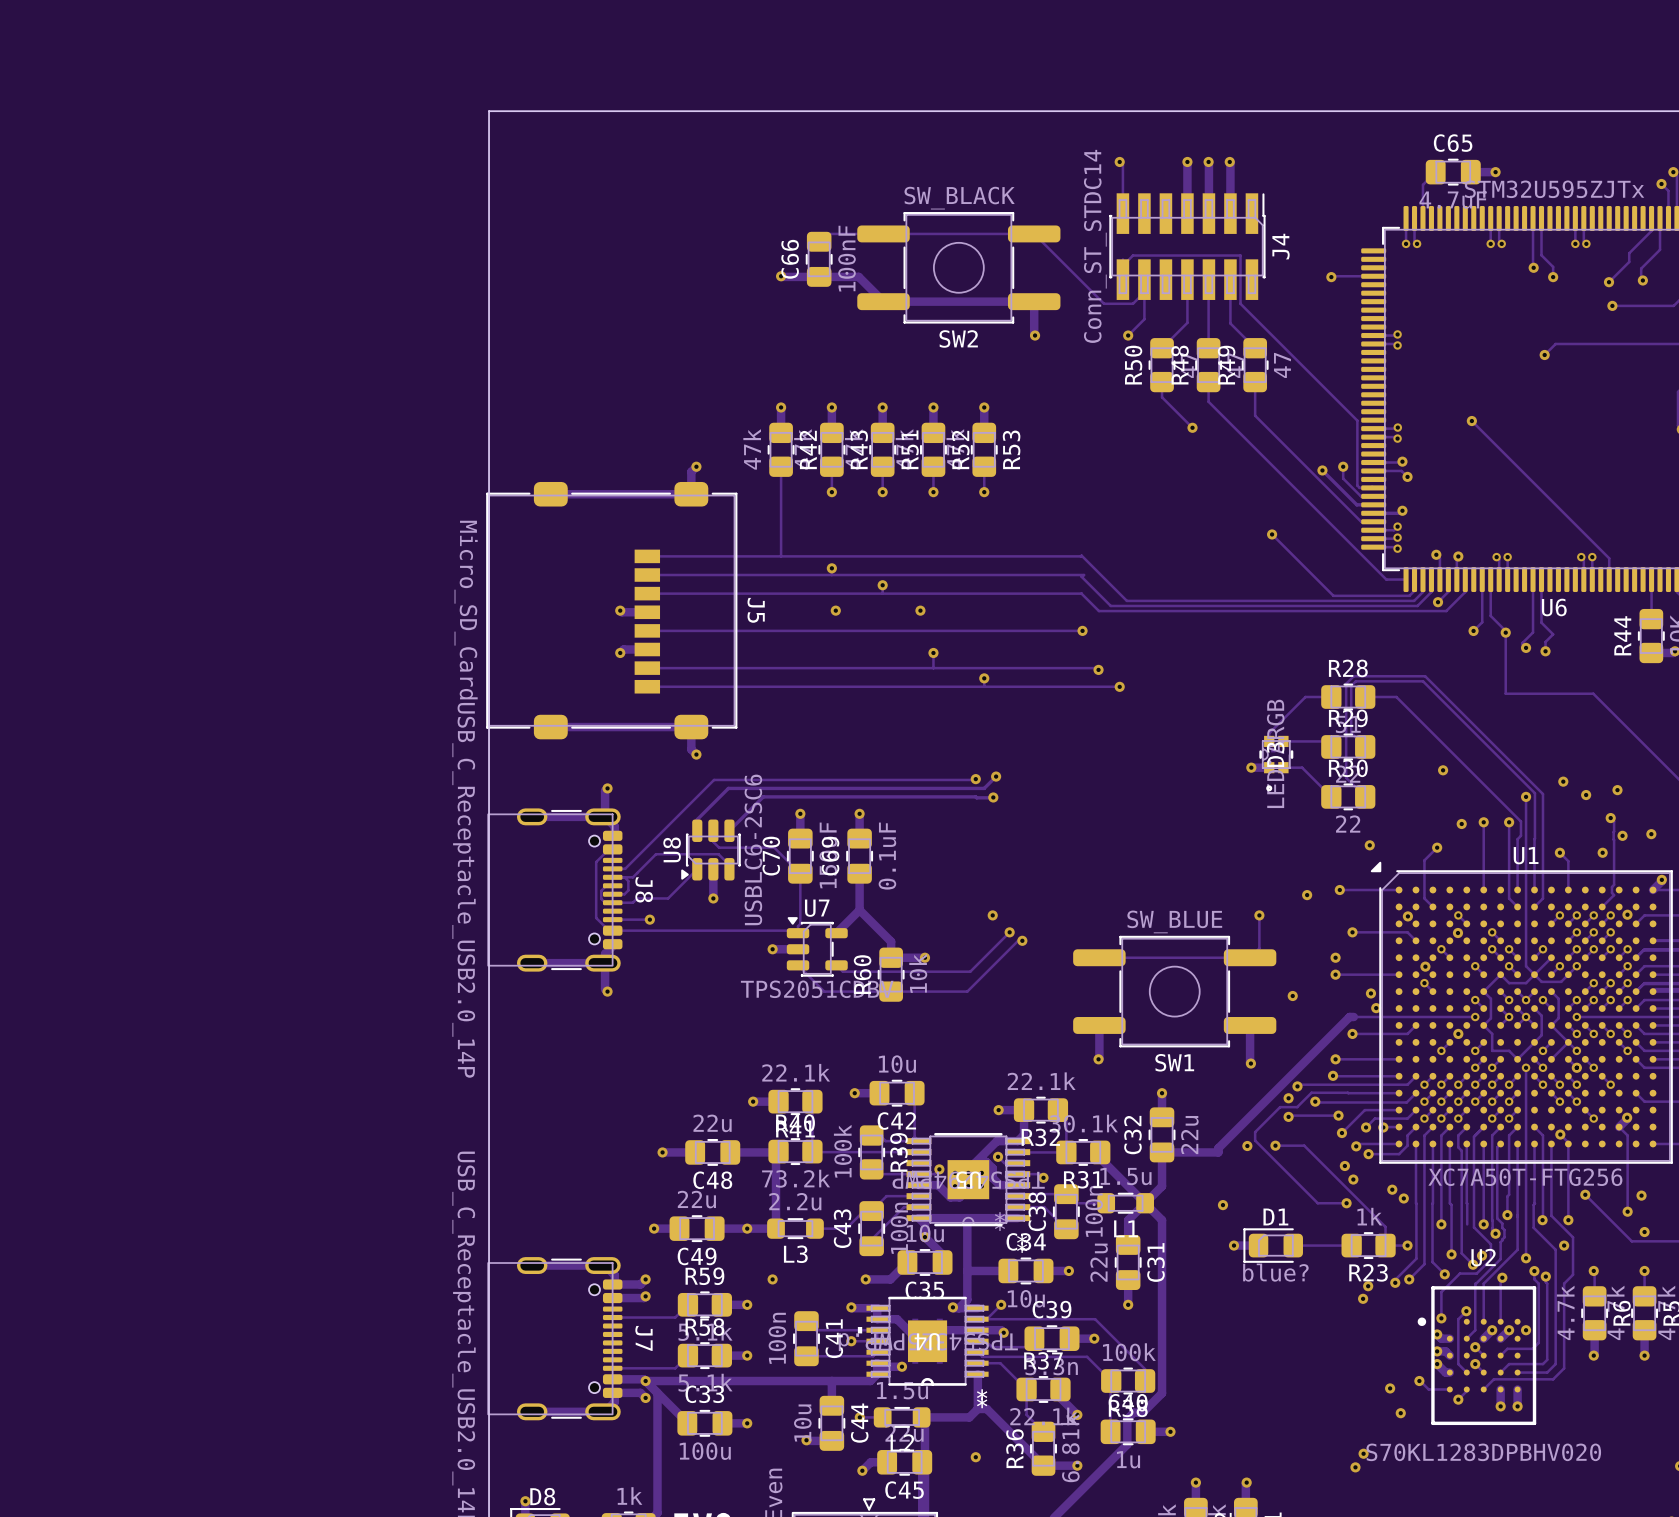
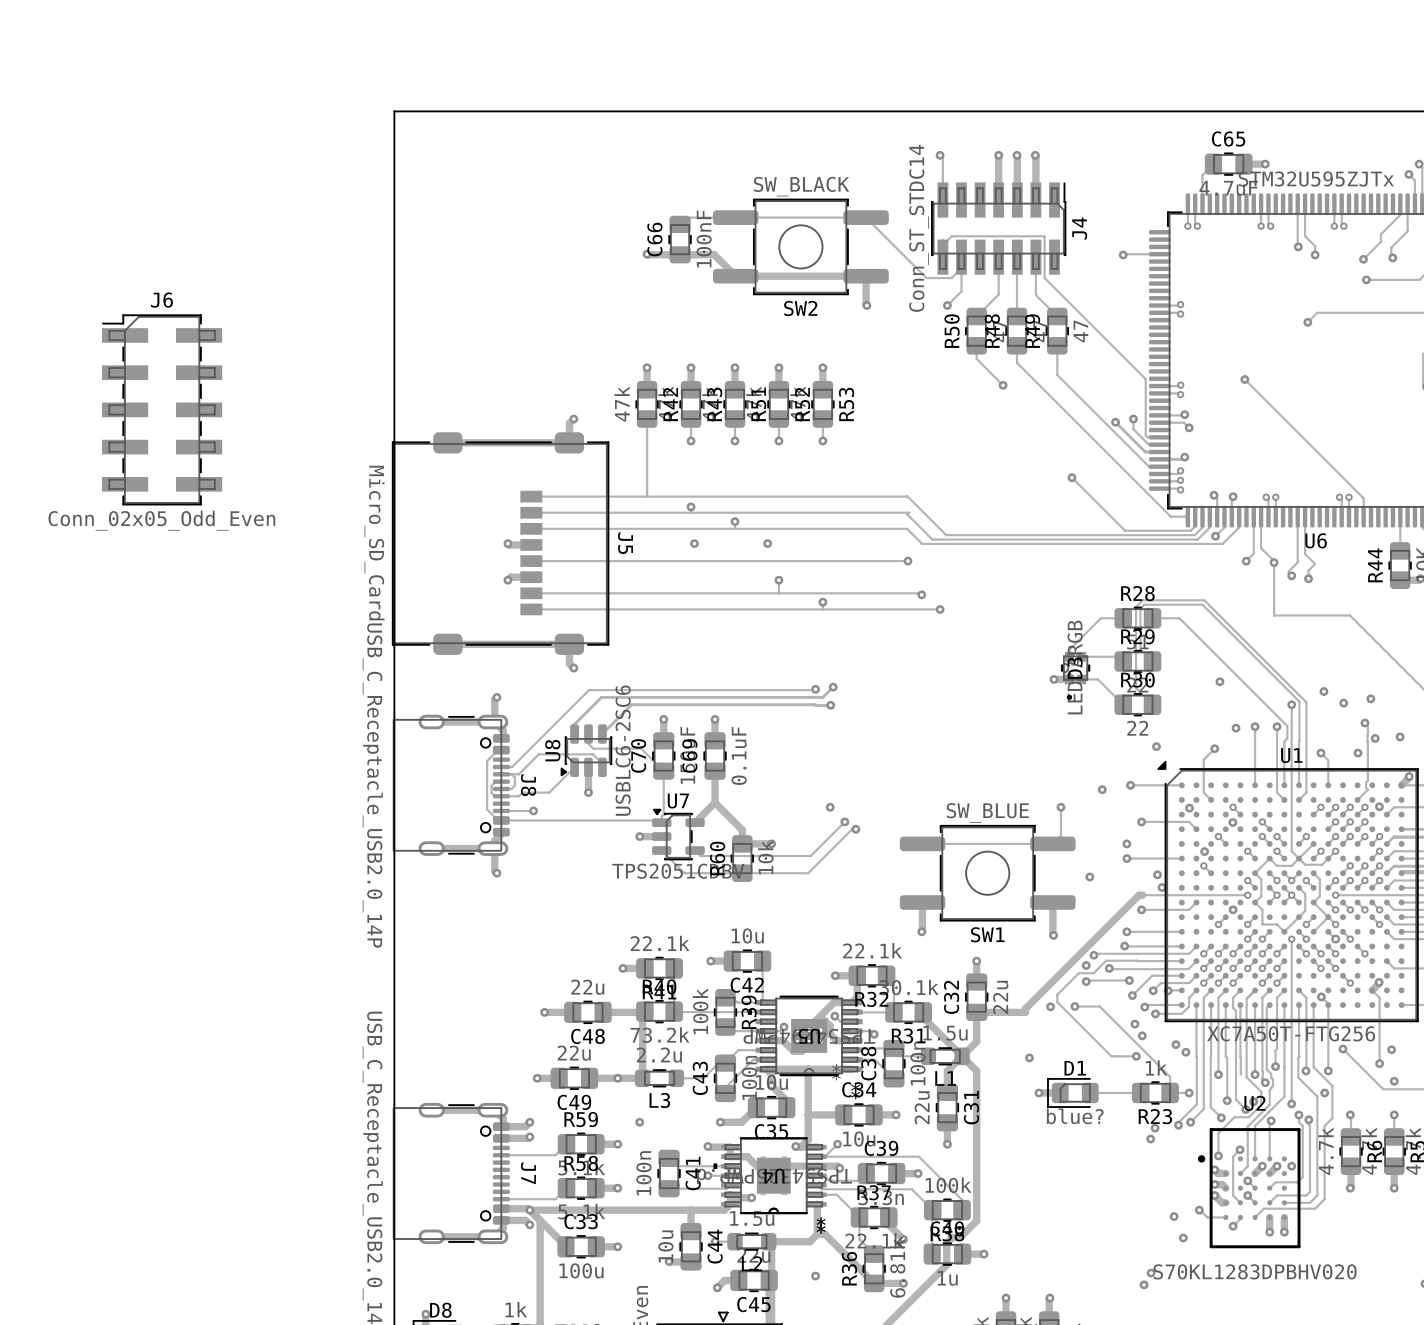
J6: none -> Conn_02x05_Odd_Even (162, 409)

